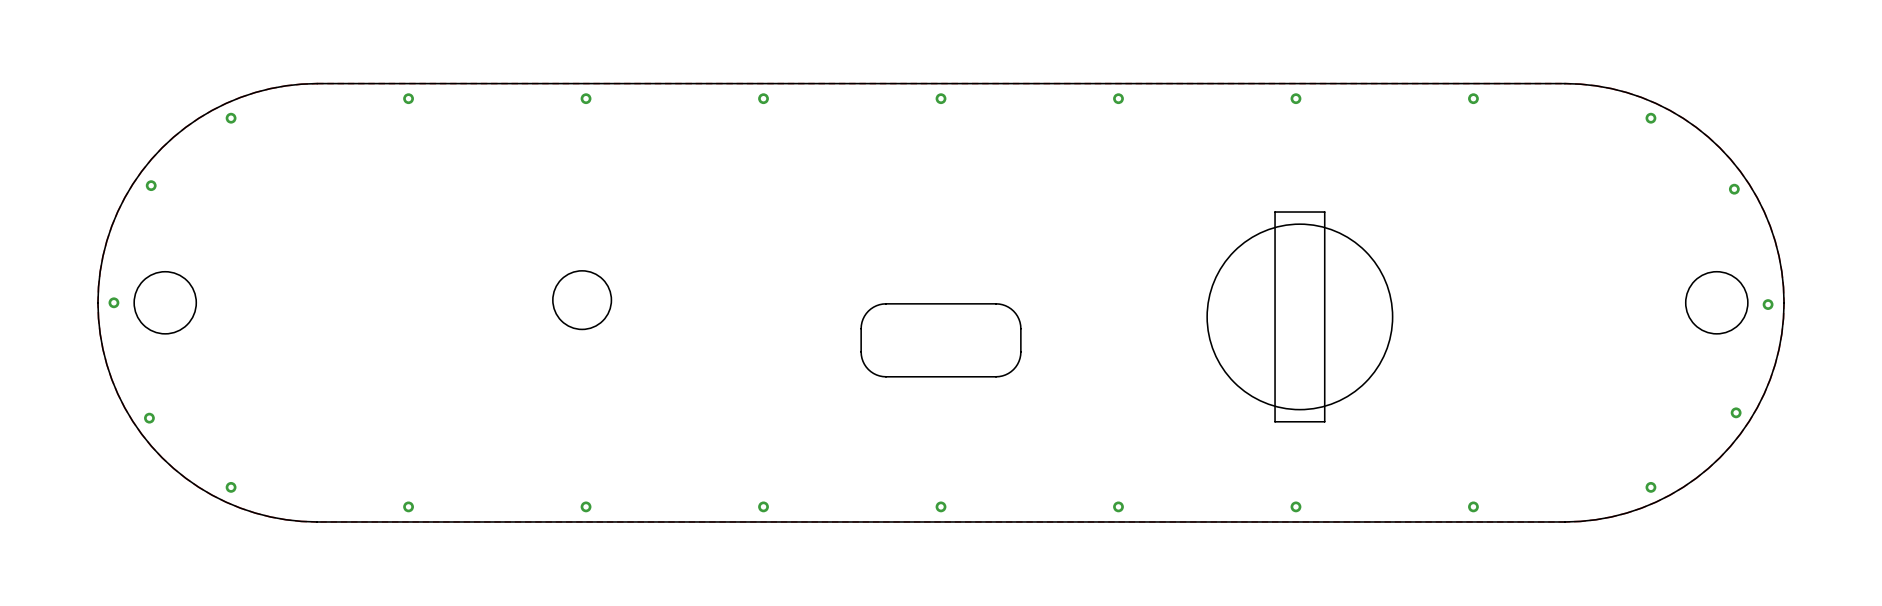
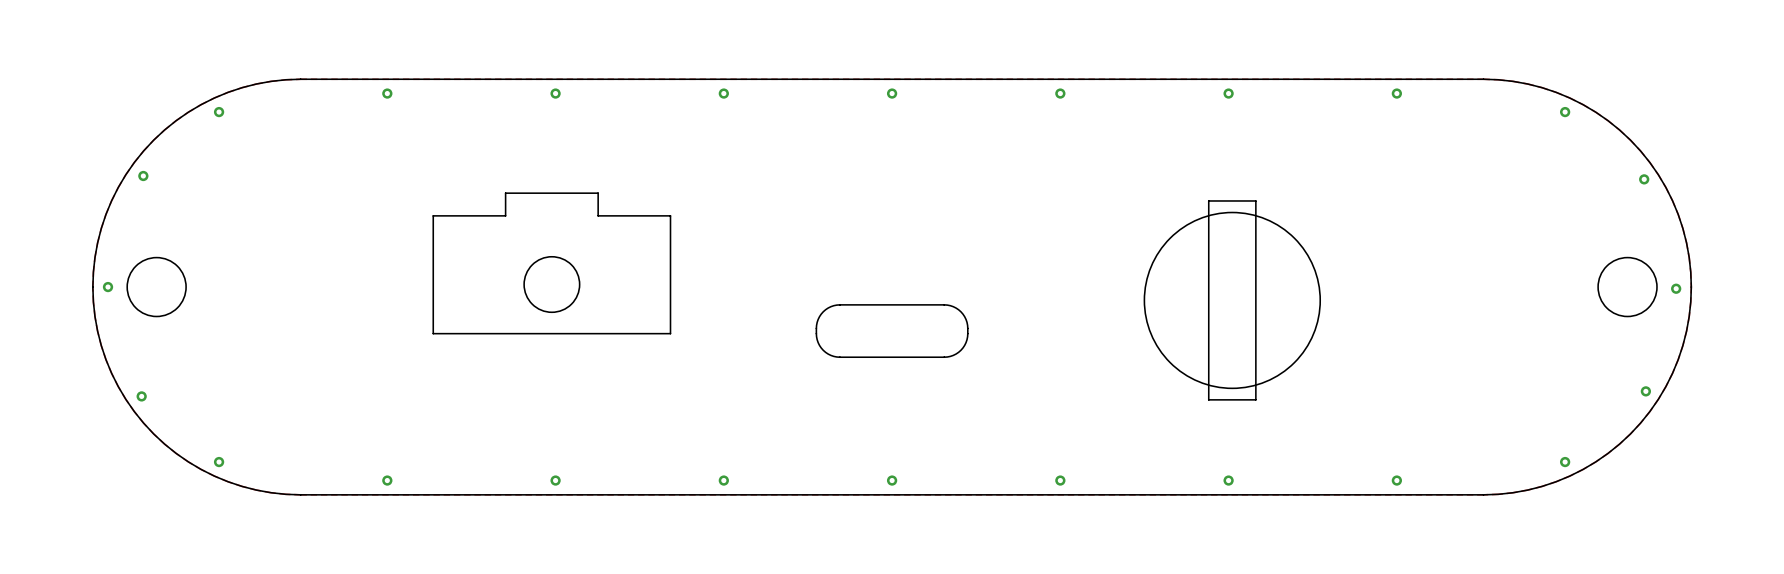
board edge: none -> (505, 193) (598, 193) (598, 215) (670, 215) (670, 333) (433, 333) (433, 215) (505, 215) (505, 193)
board edge: (861, 346) (861, 325) (864, 316) (873, 307) (885, 303) (1002, 304) (1011, 308) (1018, 319) (1020, 346) -> (816, 328) (818, 319) (823, 311) (830, 306) (839, 304) (947, 305) (956, 308) (962, 314) (967, 328)

